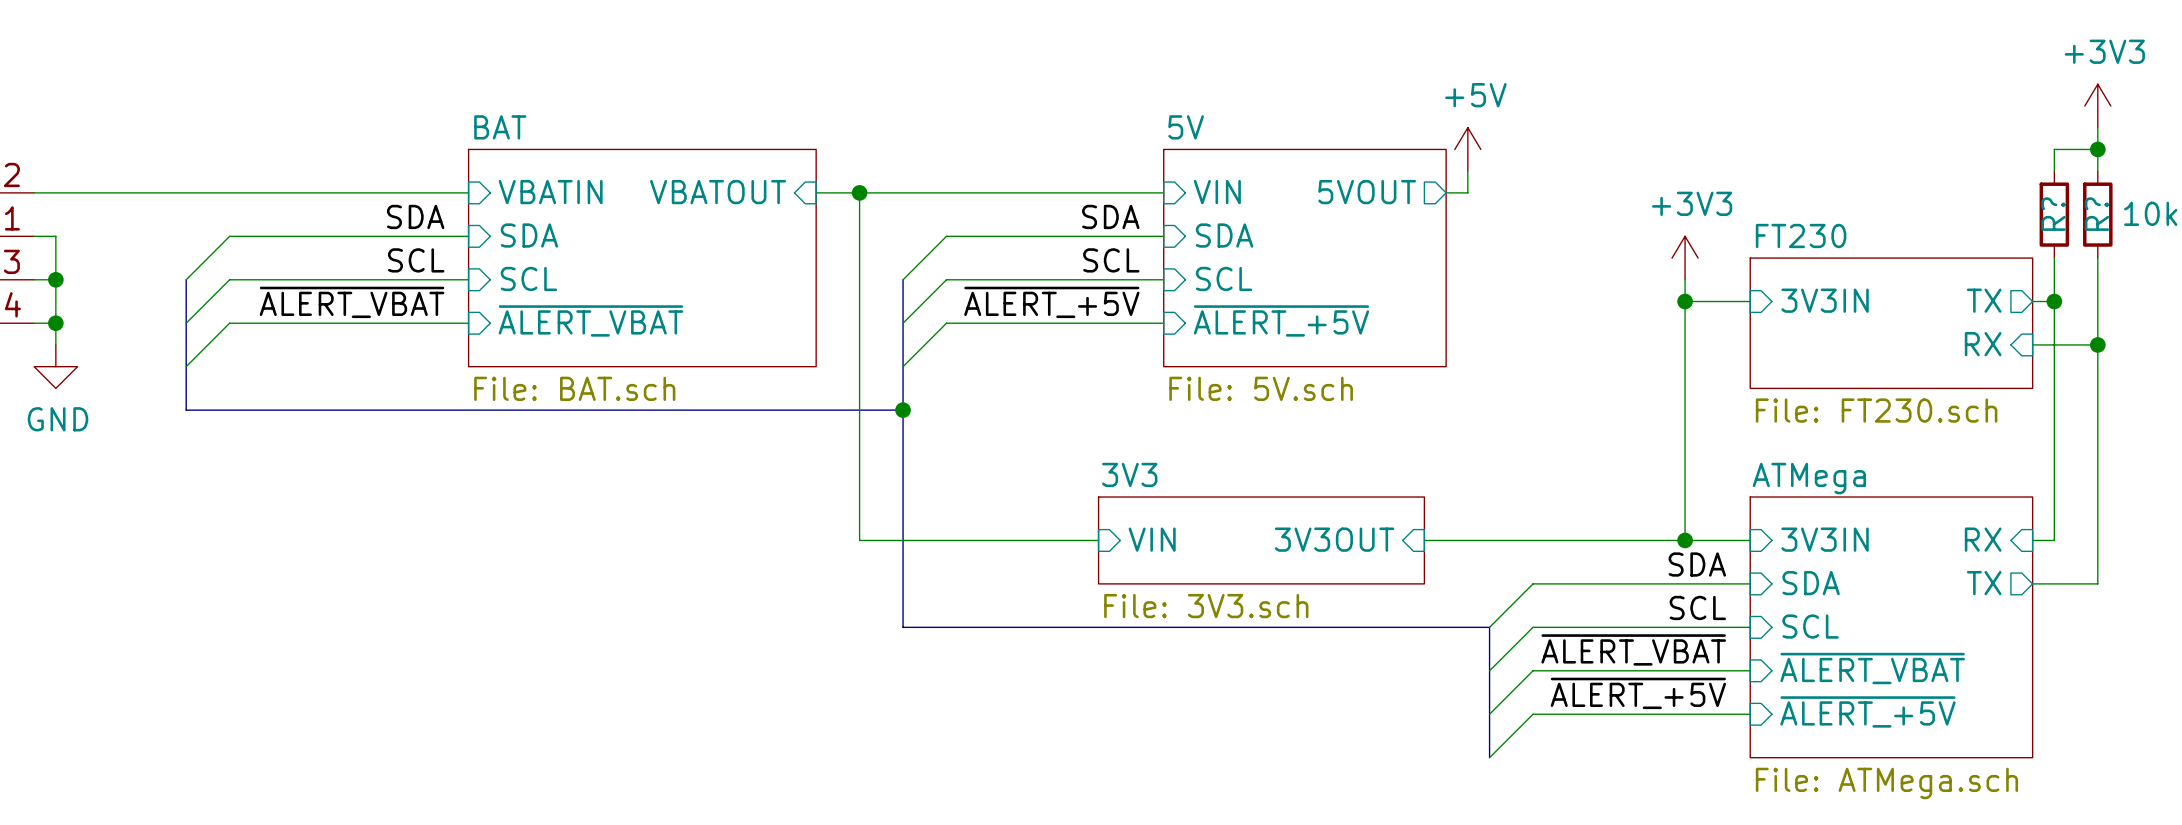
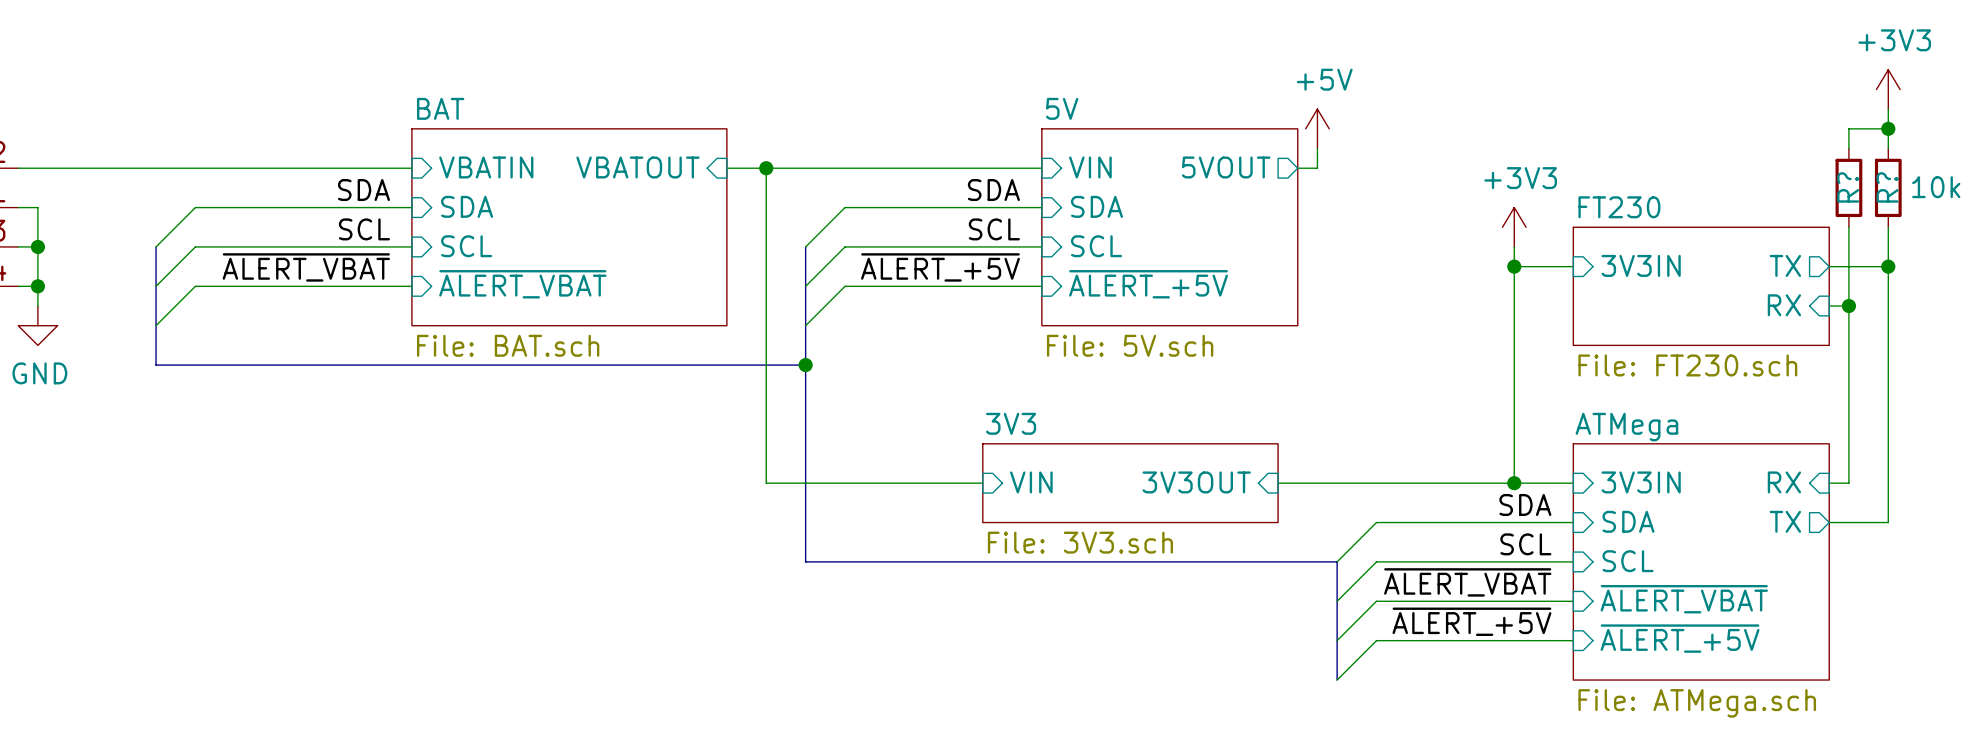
junction: (2054, 301) -> none
junction: none -> (1888, 266)
wire: (2054, 344) (2097, 344) -> (1848, 266) (1888, 266)
junction: none -> (1848, 306)
junction: (2097, 344) -> none

